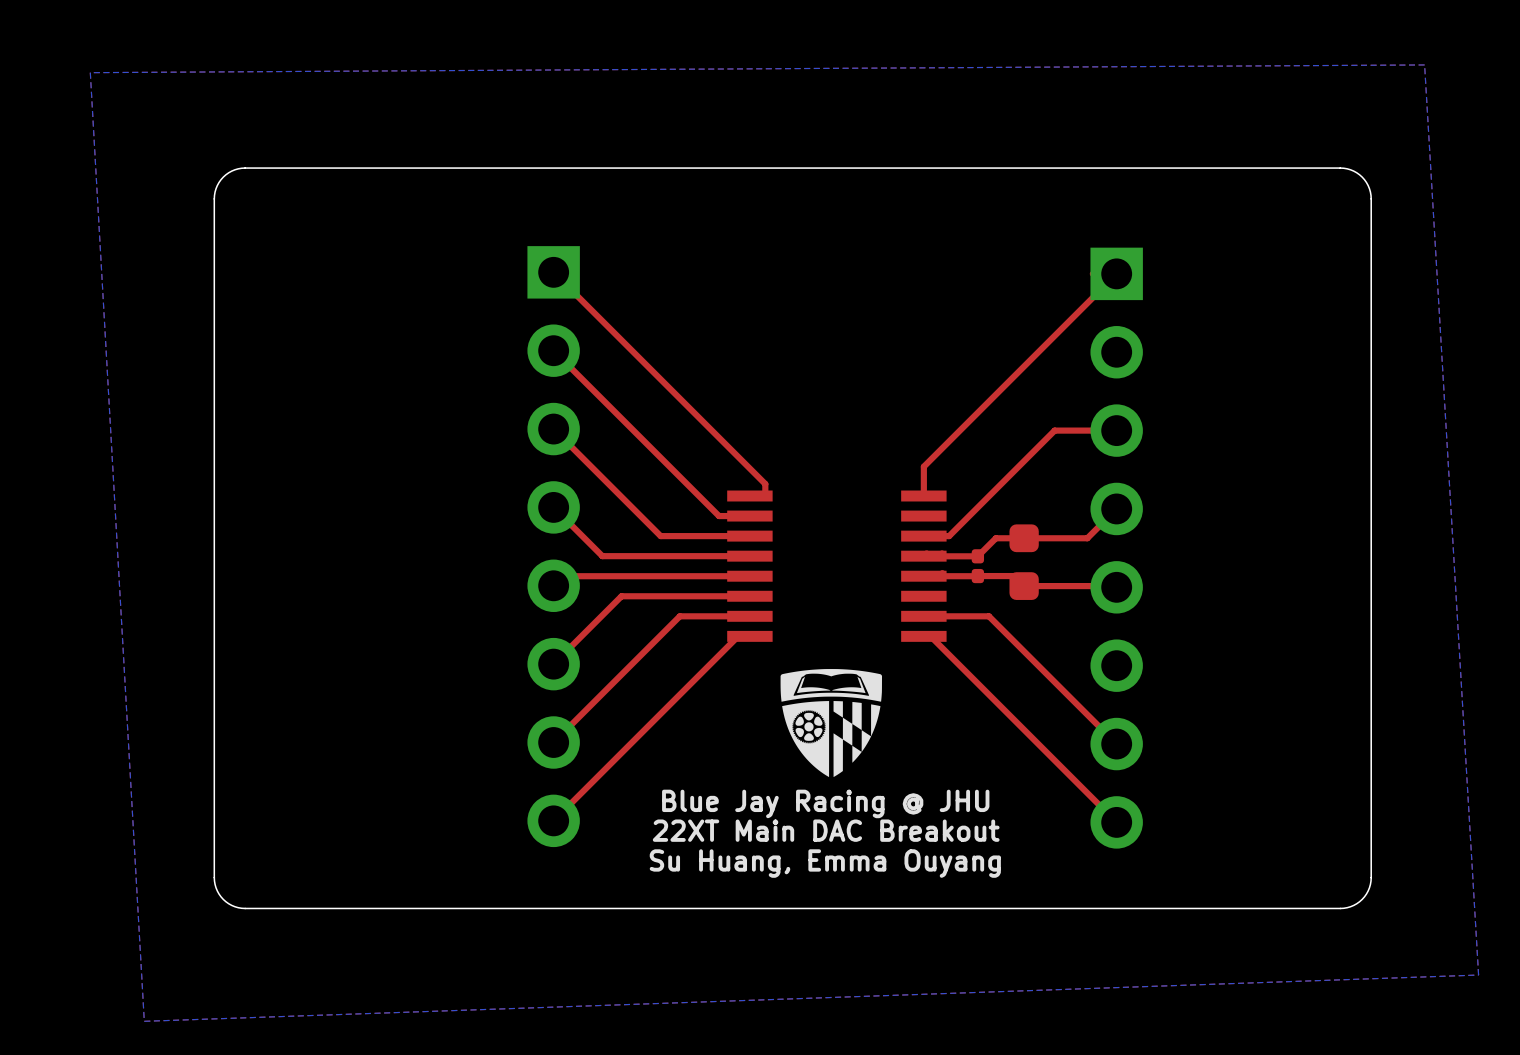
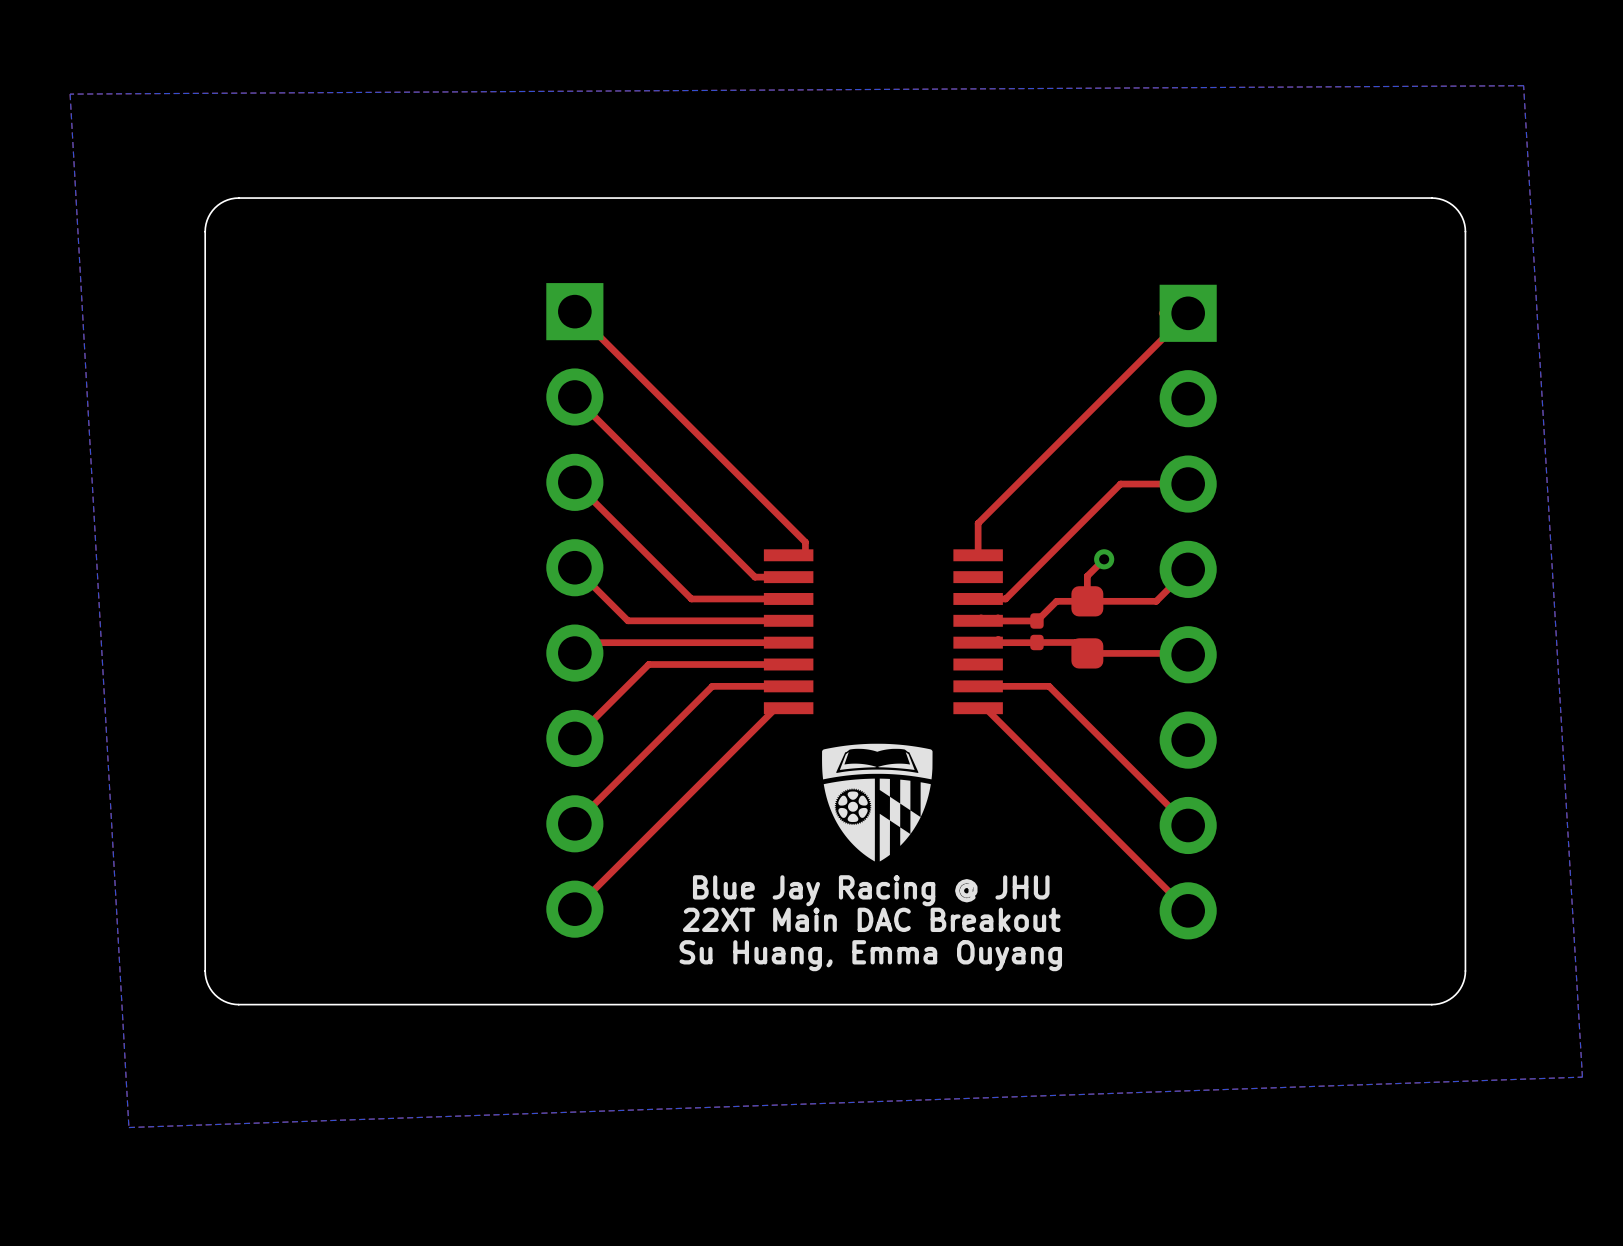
top track: none -> (1104, 559) (1087, 576) (1087, 601)
via: none -> (1104, 559)

